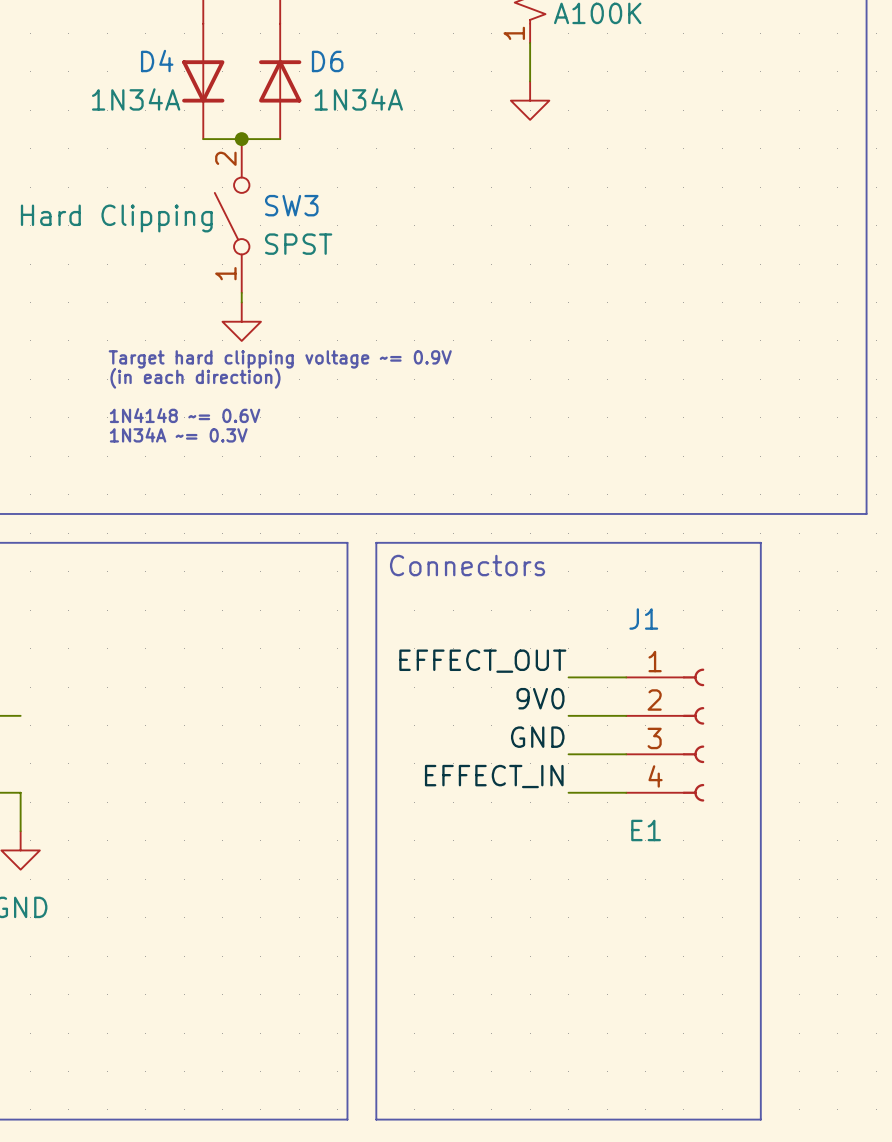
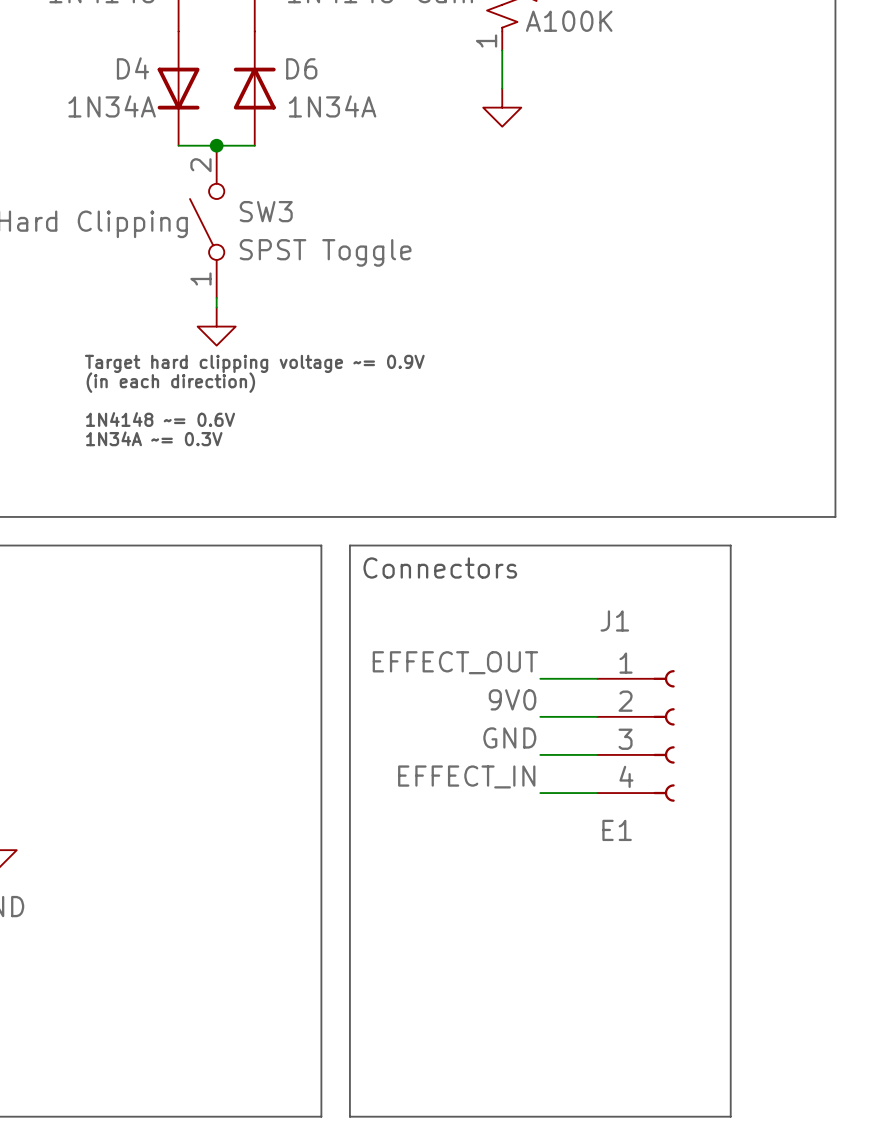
SW3 value: SPST (298, 244) -> SPST Toggle (325, 252)

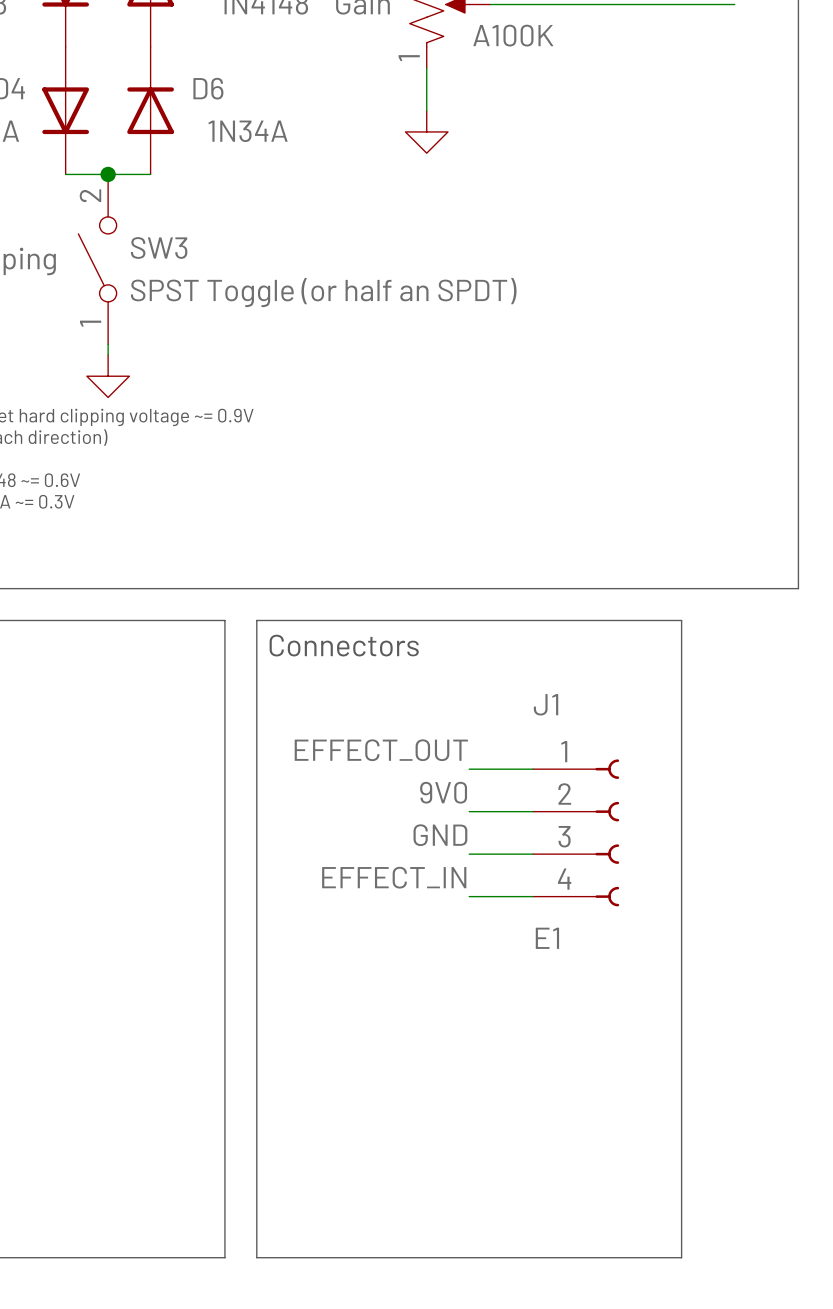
SW3 value: SPST Toggle (325, 252) -> SPST Toggle (or half an SPDT) (323, 292)

